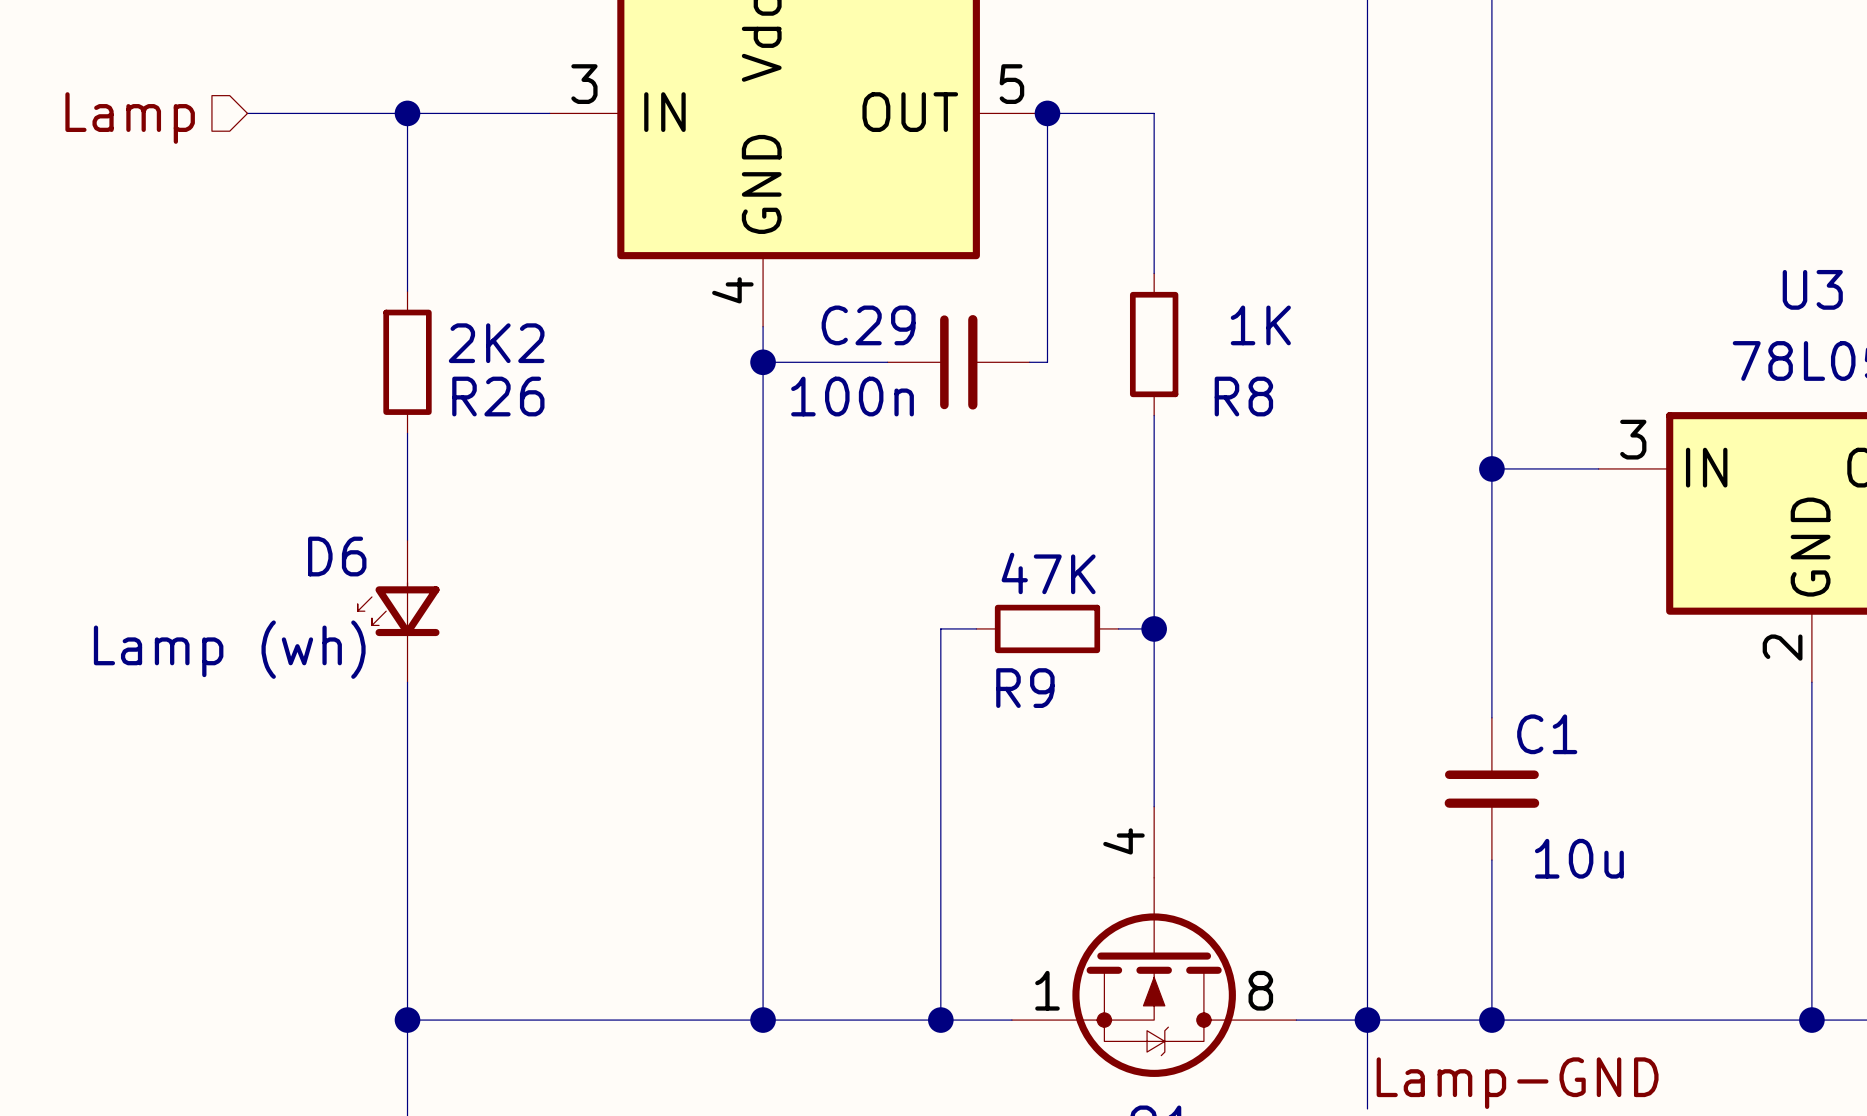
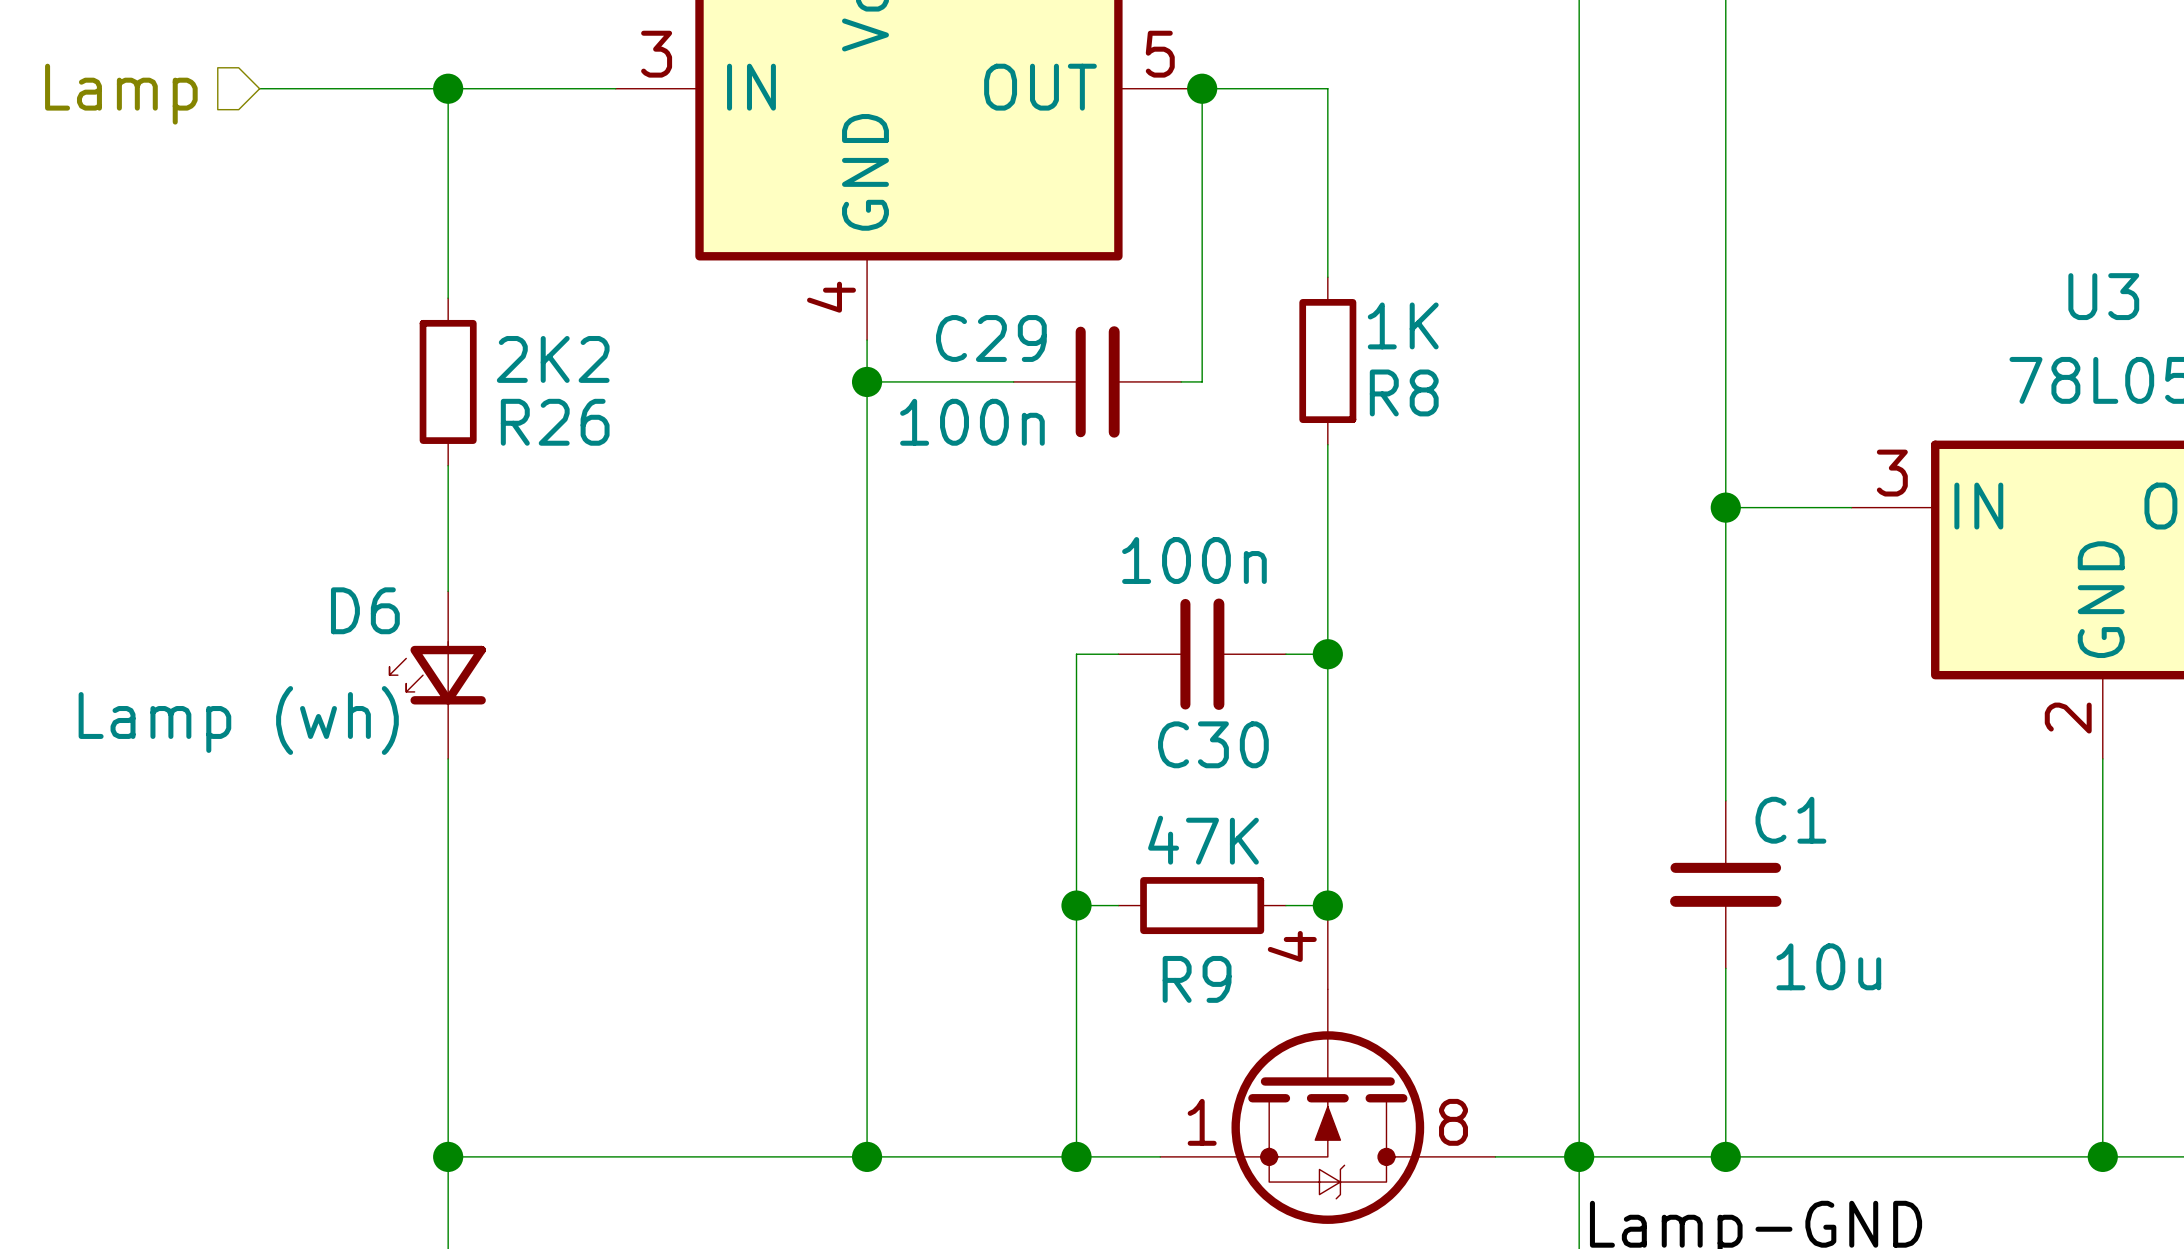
R8 value position: 1K (1260, 325) -> 1K (1403, 325)
R8 name position: R8 (1243, 396) -> R8 (1404, 392)
C30: none -> 100n (1202, 654)
wire: none -> (1285, 654) (1327, 654)
wire: (940, 628) (976, 628) -> (1076, 696) (1076, 654) (1118, 654)
R9 position: (1047, 628) -> (1202, 905)
wire: (1118, 628) (1154, 628) -> (1285, 905) (1327, 905)
junction position: (1154, 628) -> (1327, 654)
R9 name position: R9 (1025, 688) -> R9 (1197, 979)
wire: none -> (1076, 905) (1118, 905)
junction: none -> (1076, 905)
junction: none -> (1327, 905)

